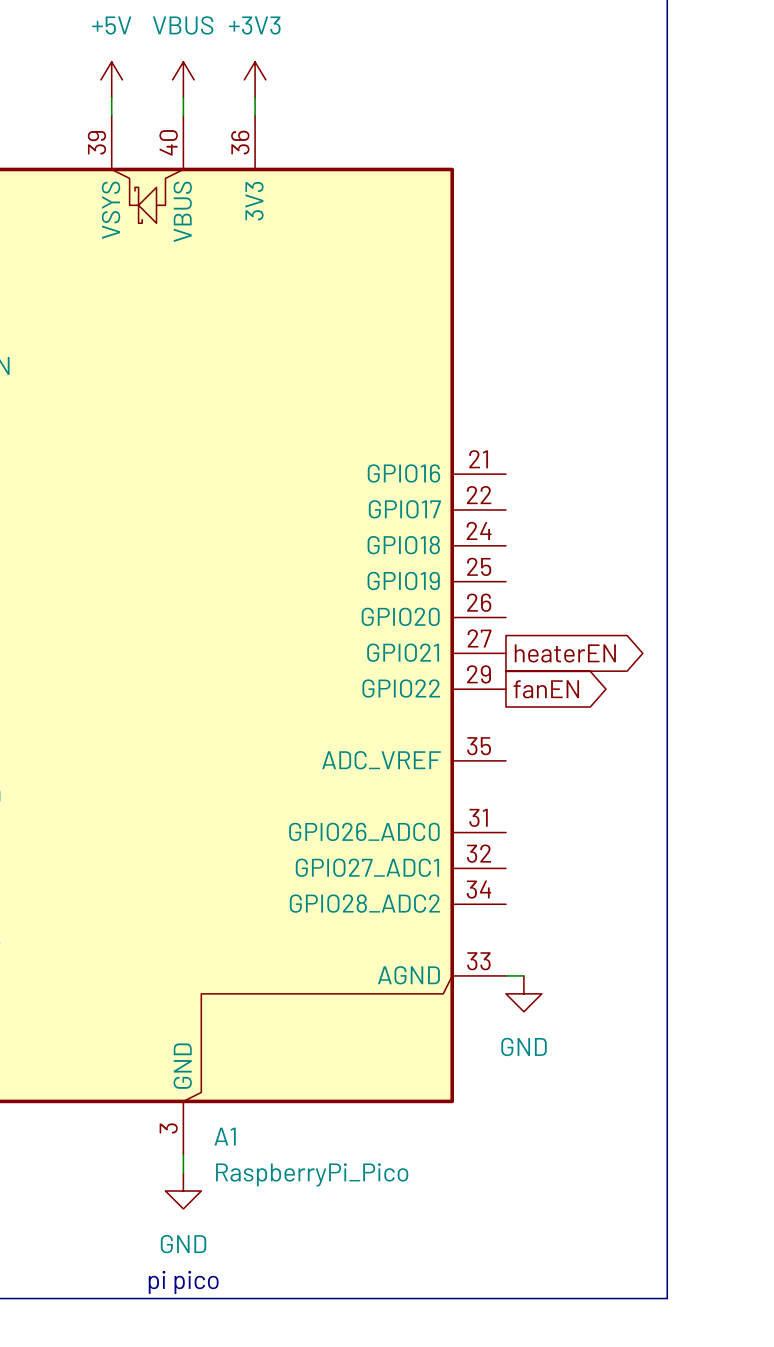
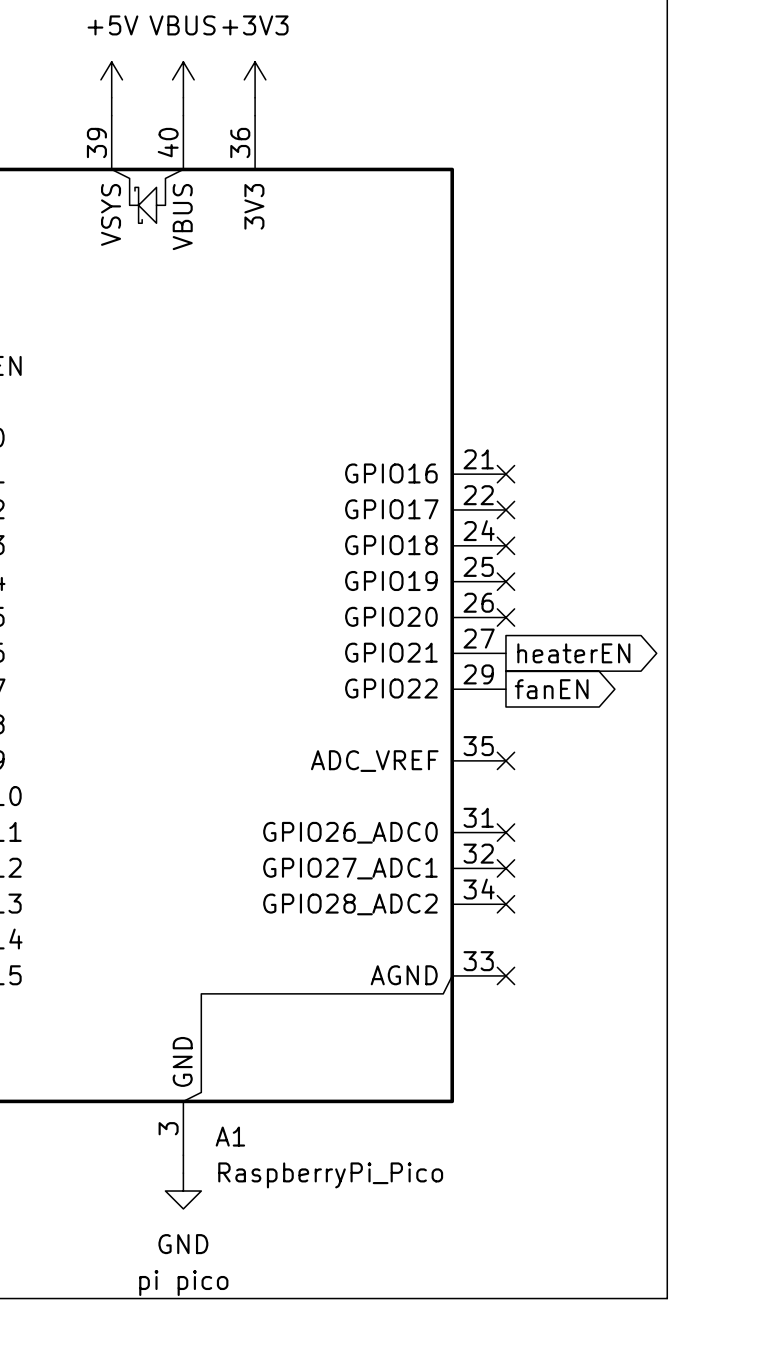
no-connect mark: none -> (505, 474)
no-connect mark: none -> (505, 509)
no-connect mark: none -> (505, 545)
no-connect mark: none -> (505, 581)
no-connect mark: none -> (505, 617)
no-connect mark: none -> (505, 760)
no-connect mark: none -> (505, 832)
no-connect mark: none -> (505, 868)
no-connect mark: none -> (505, 904)
wire: (505, 975) (523, 975) -> none
no-connect mark: none -> (505, 975)
power symbol: GND (523, 993) -> none

